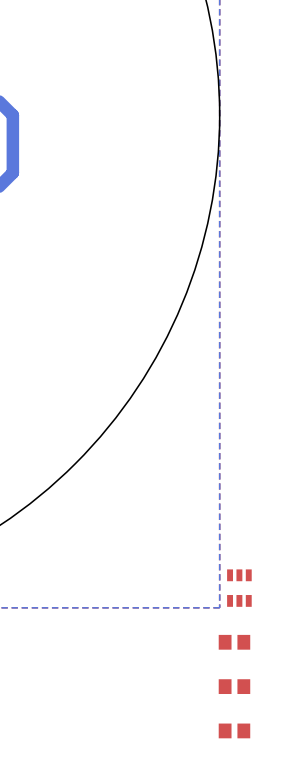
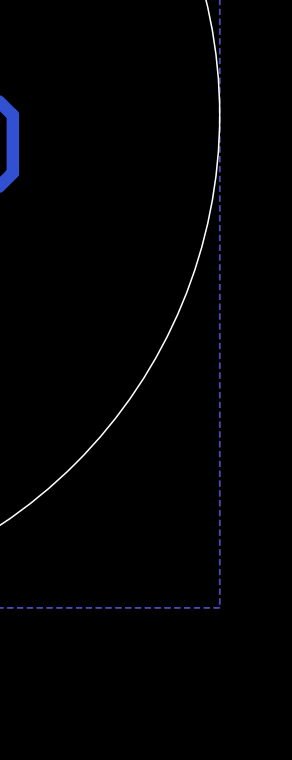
part: (239, 588) -> none
part: (234, 642) -> none
part: (234, 686) -> none
part: (234, 730) -> none

